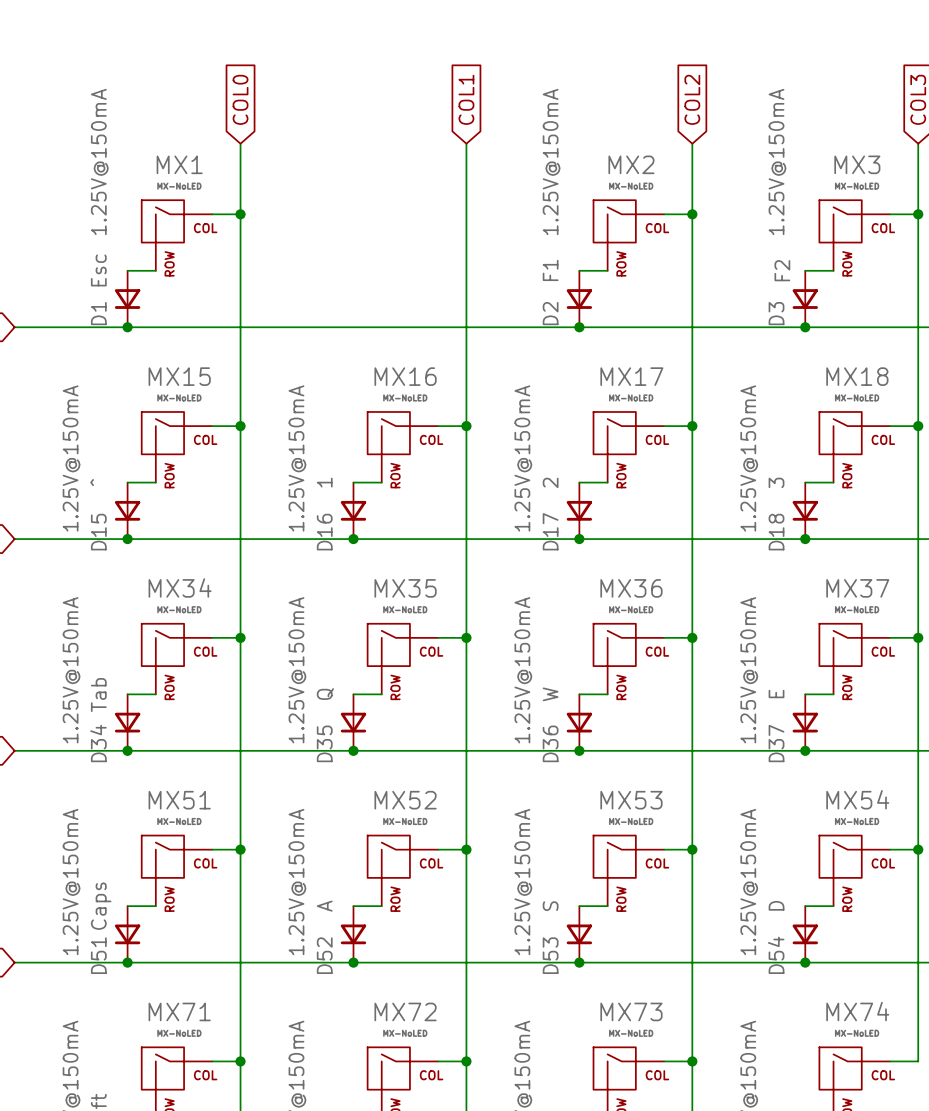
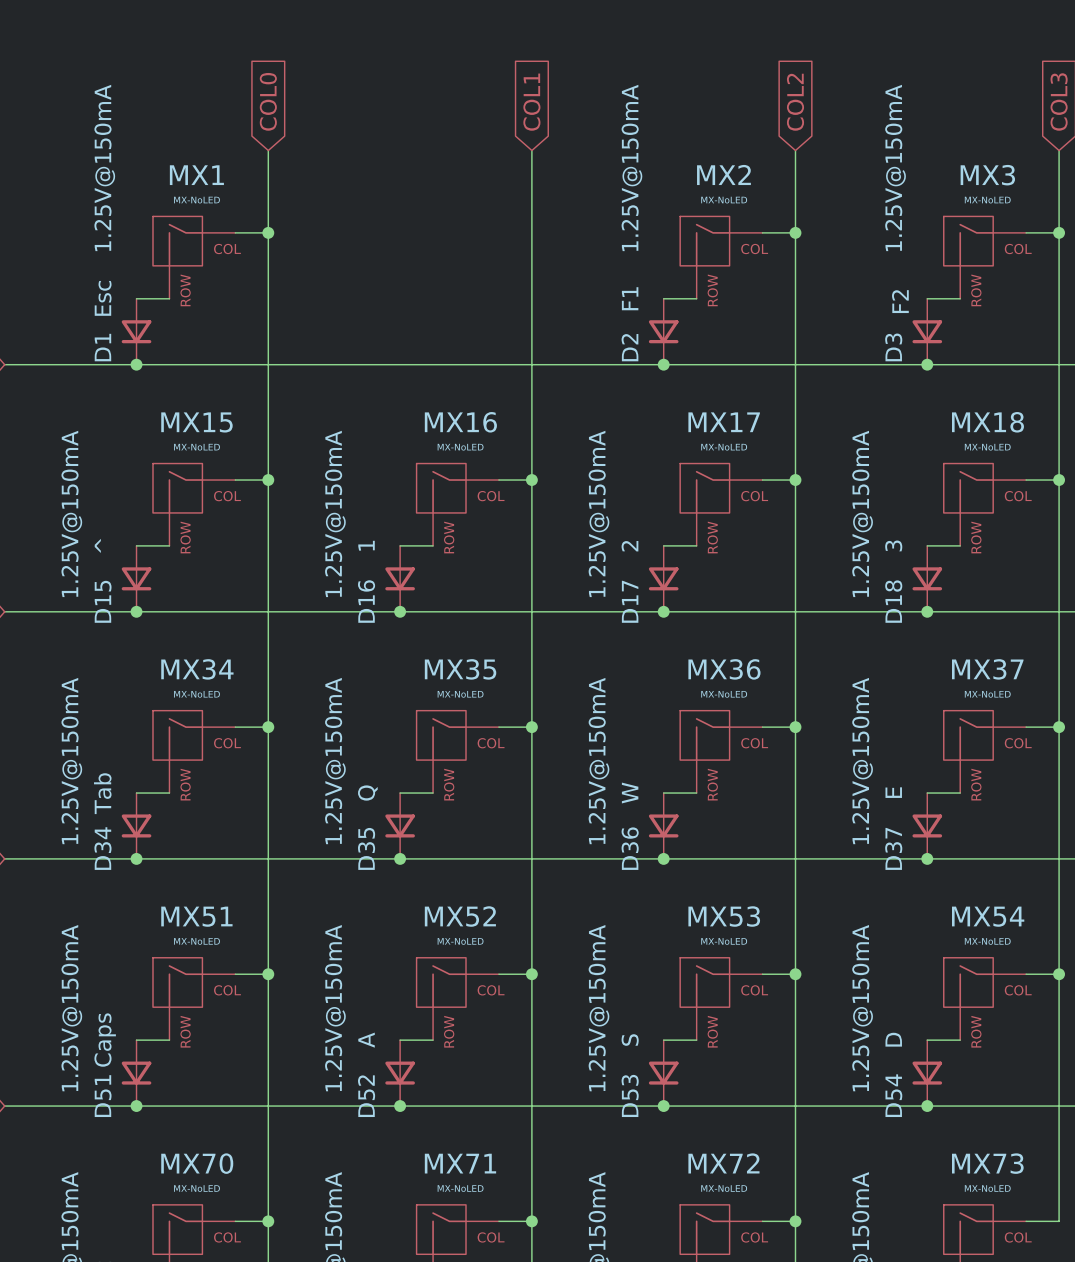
MX71 name: MX71 (179, 1011) -> MX70 (197, 1163)
MX72 name: MX72 (405, 1011) -> MX71 (460, 1163)
MX73 name: MX73 (631, 1011) -> MX72 (723, 1163)
MX74 name: MX74 (857, 1011) -> MX73 (987, 1163)

